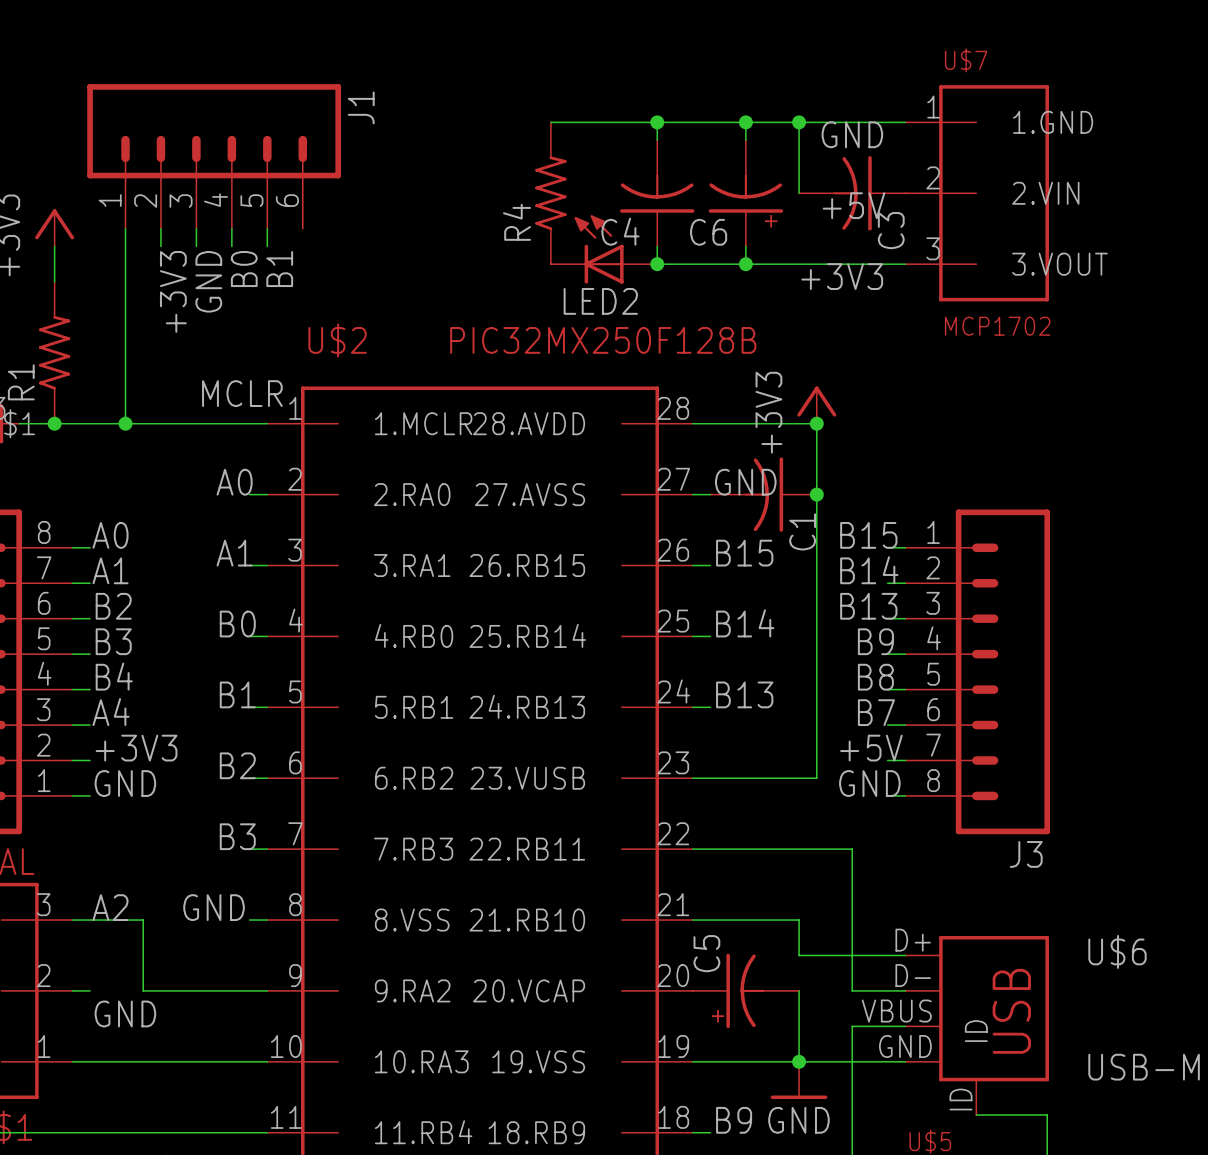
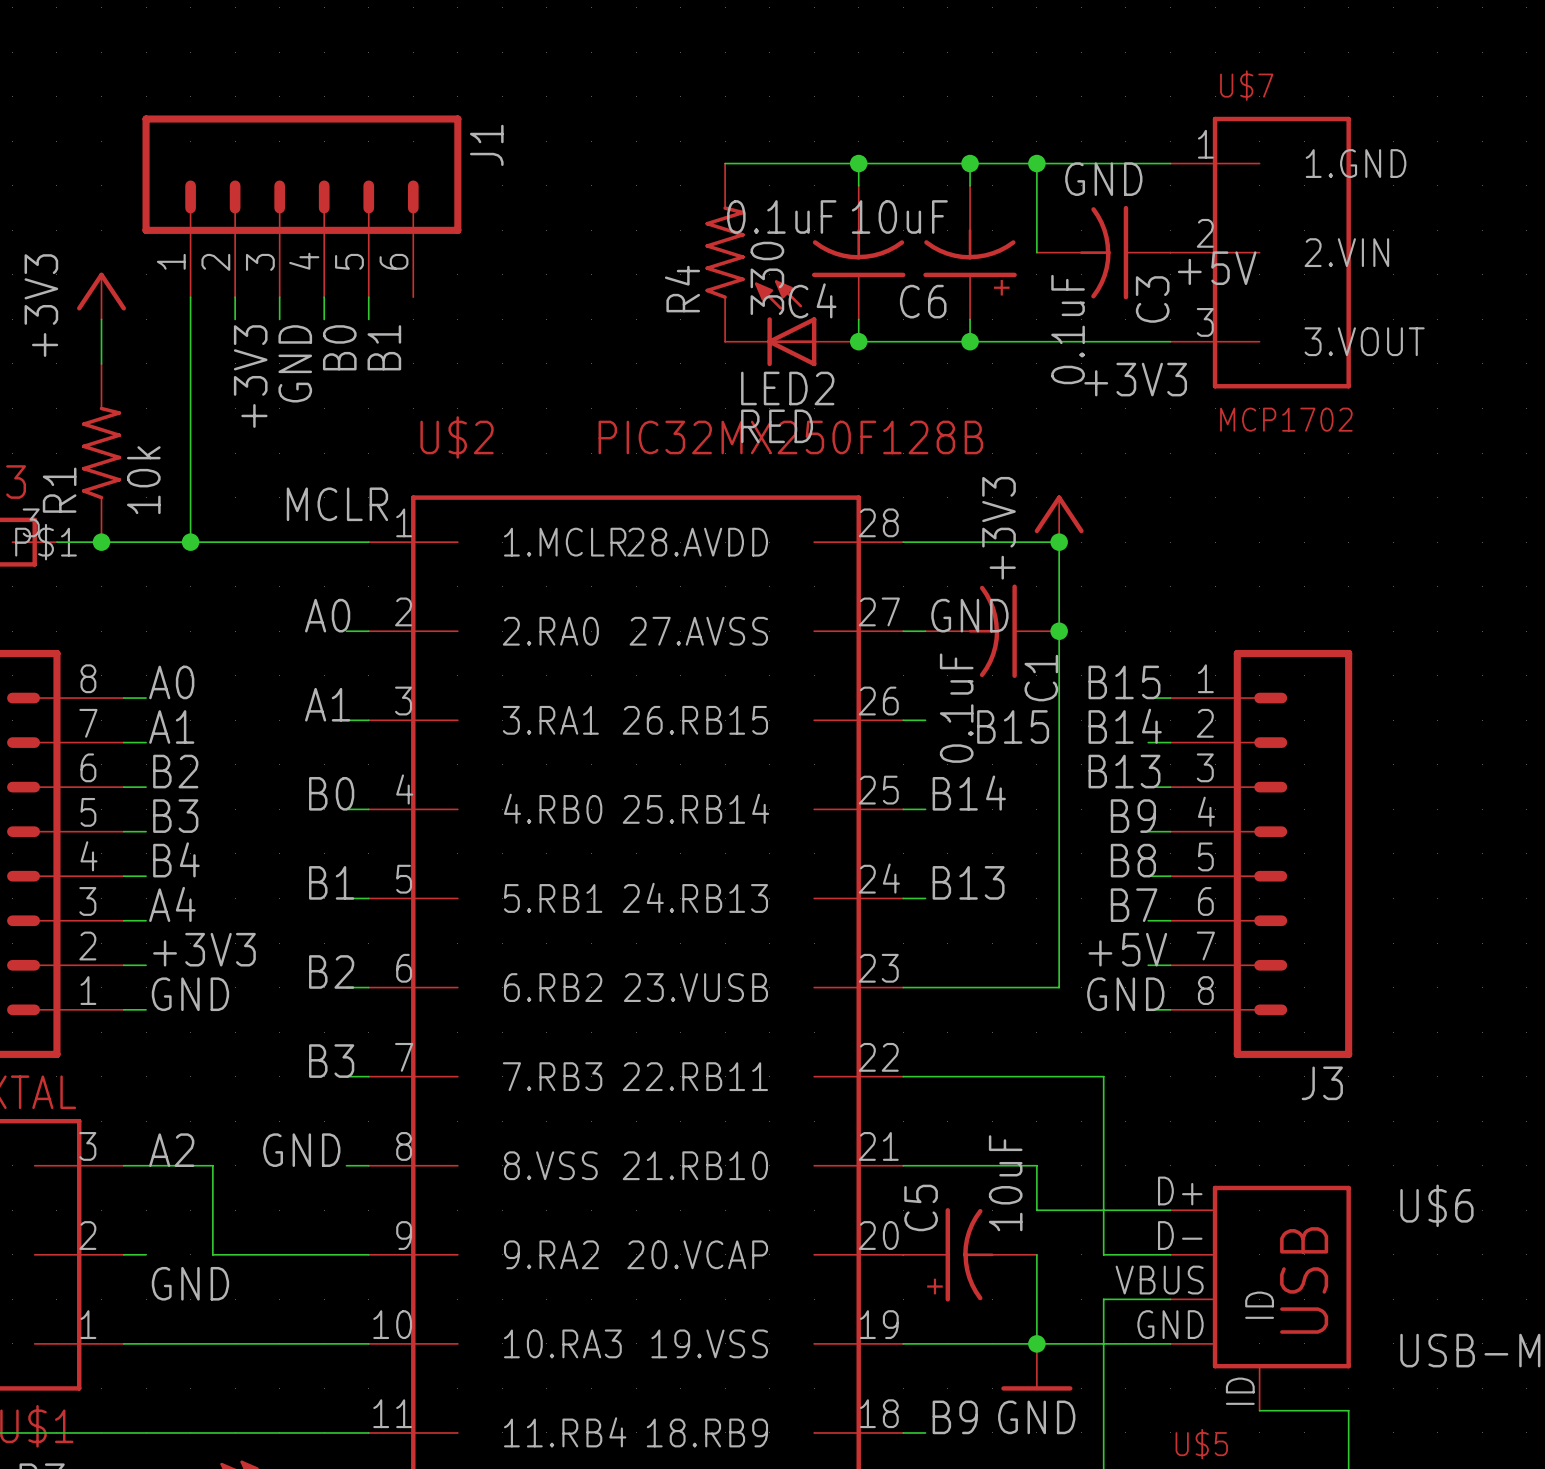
C4 value: none -> 0.1uF (781, 216)
C6 value: none -> 10uF (899, 216)
label position: +5V (853, 205) -> +5V (1217, 268)
R4 value: none -> 330 (767, 278)
C3 value: none -> 0.1uF (1068, 329)
label position: +3V3 (842, 276) -> +3V3 (1135, 379)
LED2 value: none -> RED (777, 426)
R1 value: none -> 10k (143, 480)
label position: B15 (744, 553) -> B15 (1013, 726)
C1 value: none -> 0.1uF (956, 708)
C5 value: none -> 10uF (1005, 1183)

